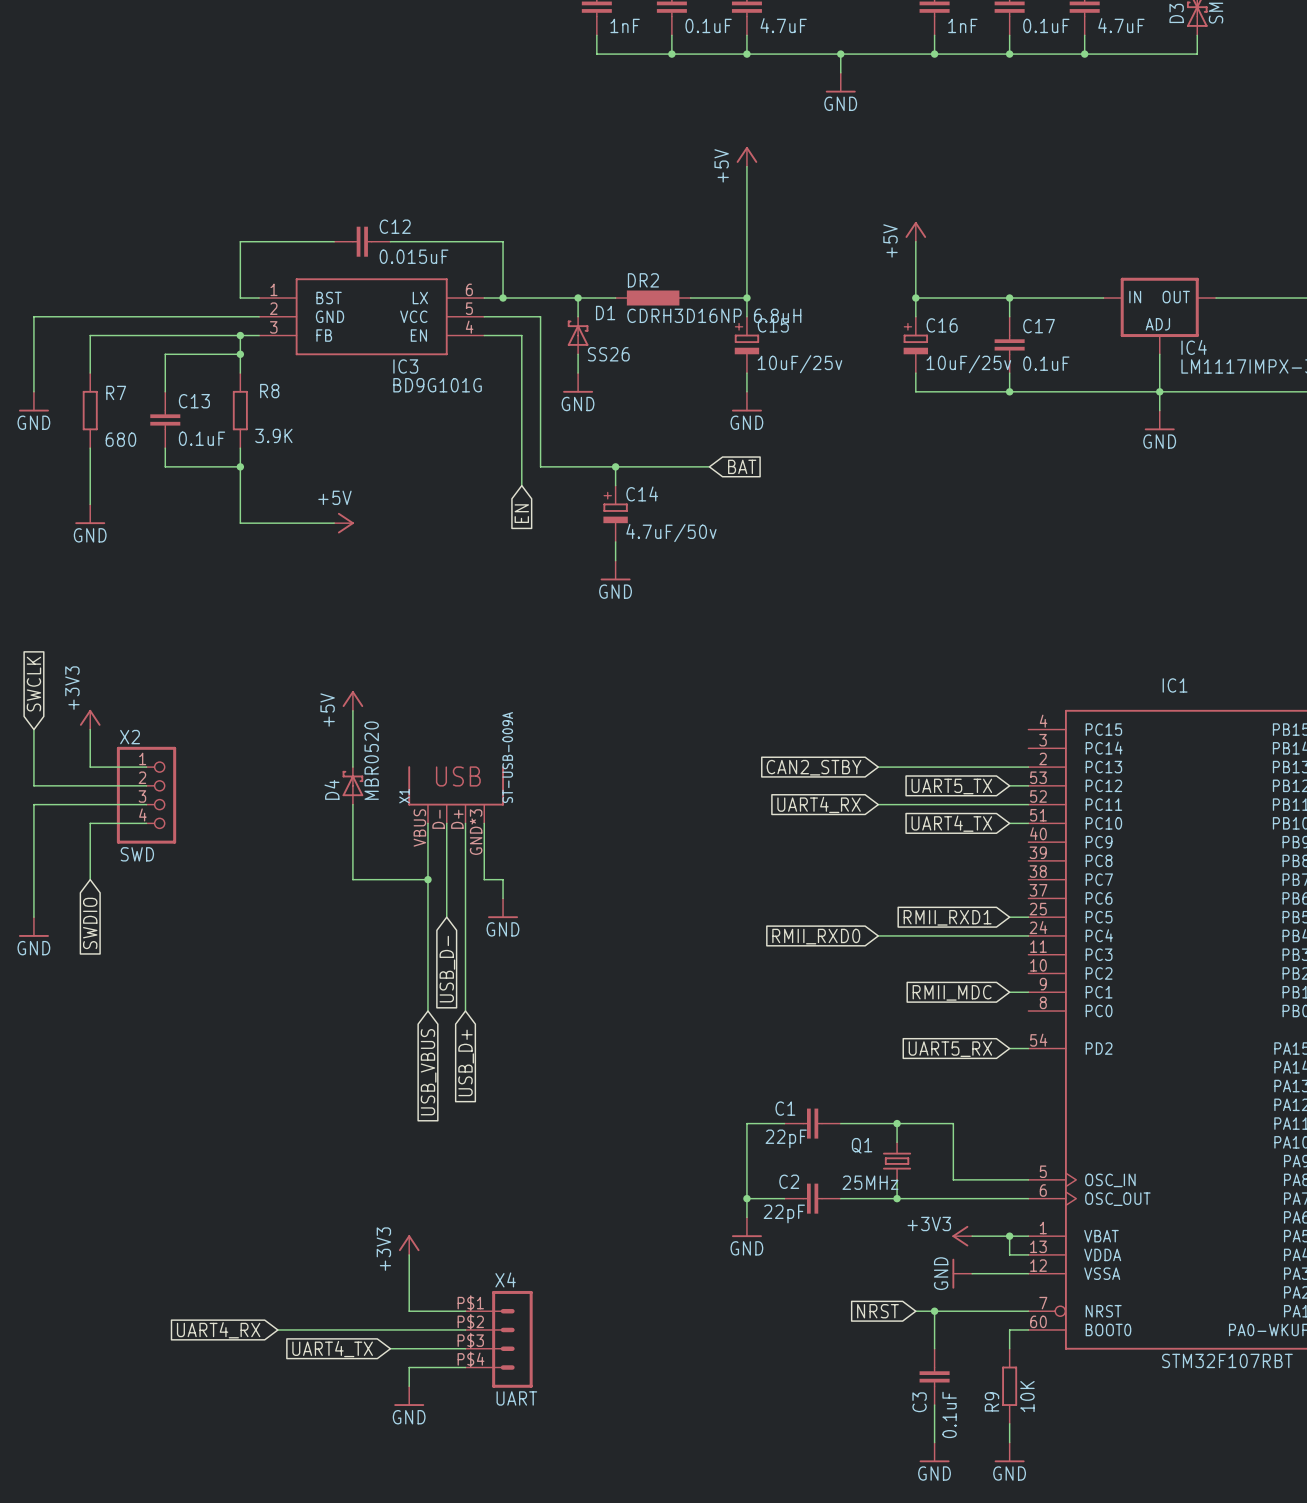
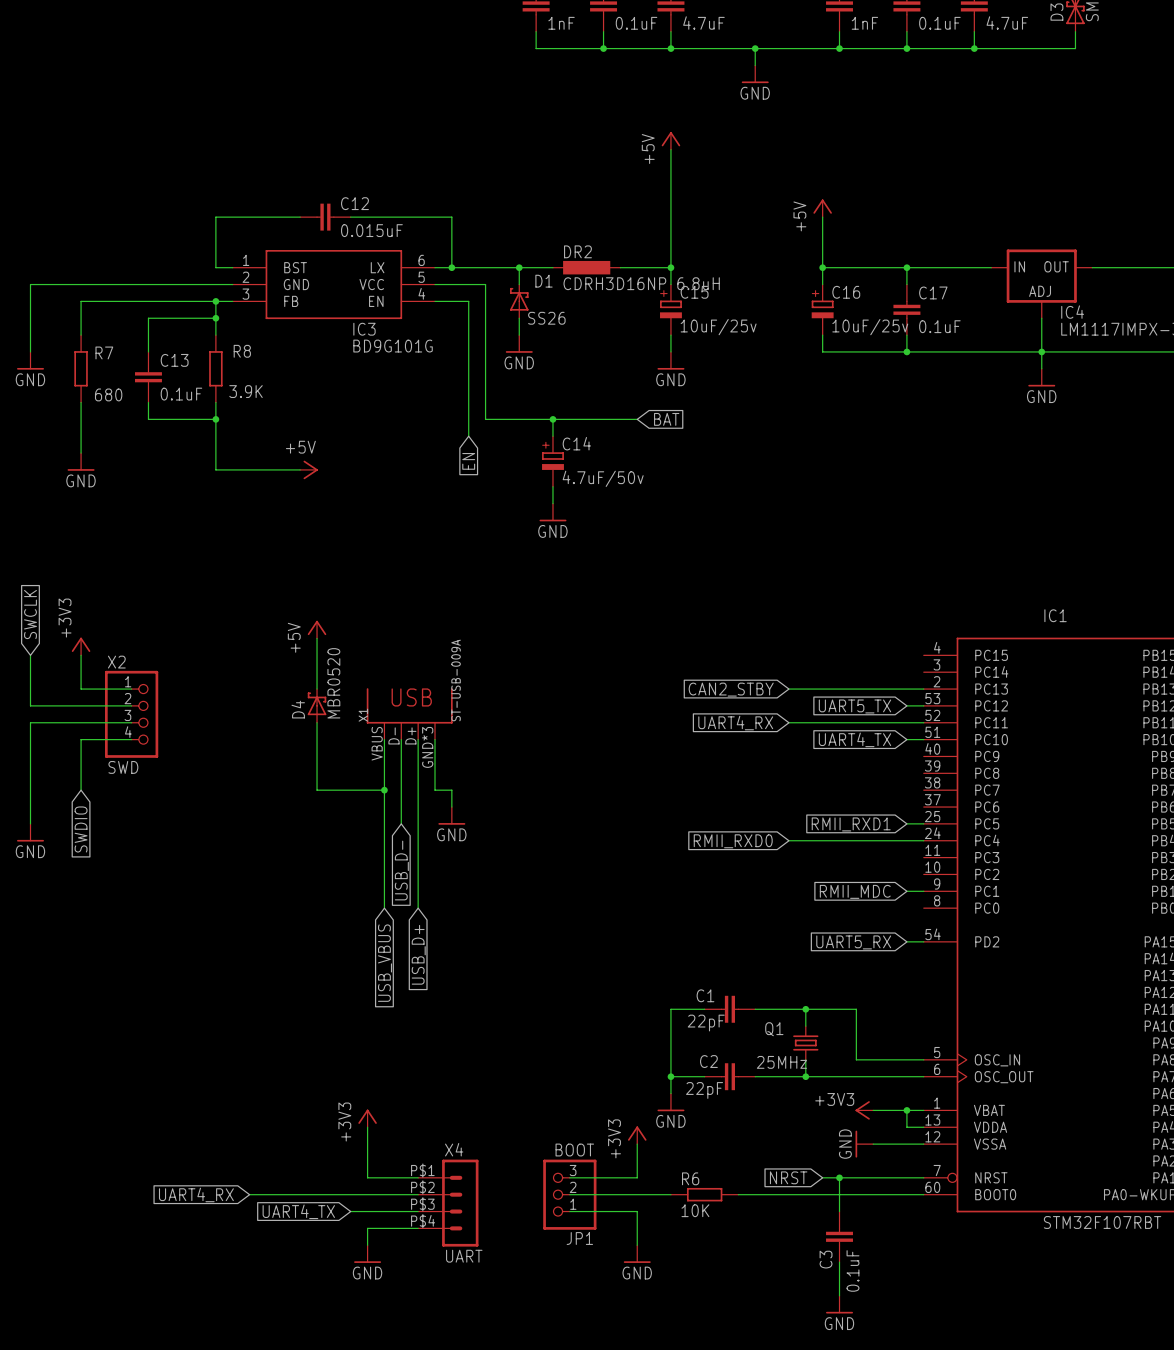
power symbol: none -> +3V3 (637, 1135)
wire: none -> (637, 1144) (637, 1177) (569, 1177)
wire: none -> (569, 1194) (670, 1194)
JP1: none -> BOOT (569, 1194)
R6: none -> 10K (704, 1194)
wire: (1009, 1329) (1009, 1348) -> (906, 1194) (738, 1194)
wire: none -> (569, 1211) (637, 1211) (637, 1245)
R9: 10K (1009, 1386) -> none
power symbol: none -> GND (637, 1254)
wire: (1009, 1423) (1009, 1442) -> none
power symbol: GND (1009, 1452) -> none

